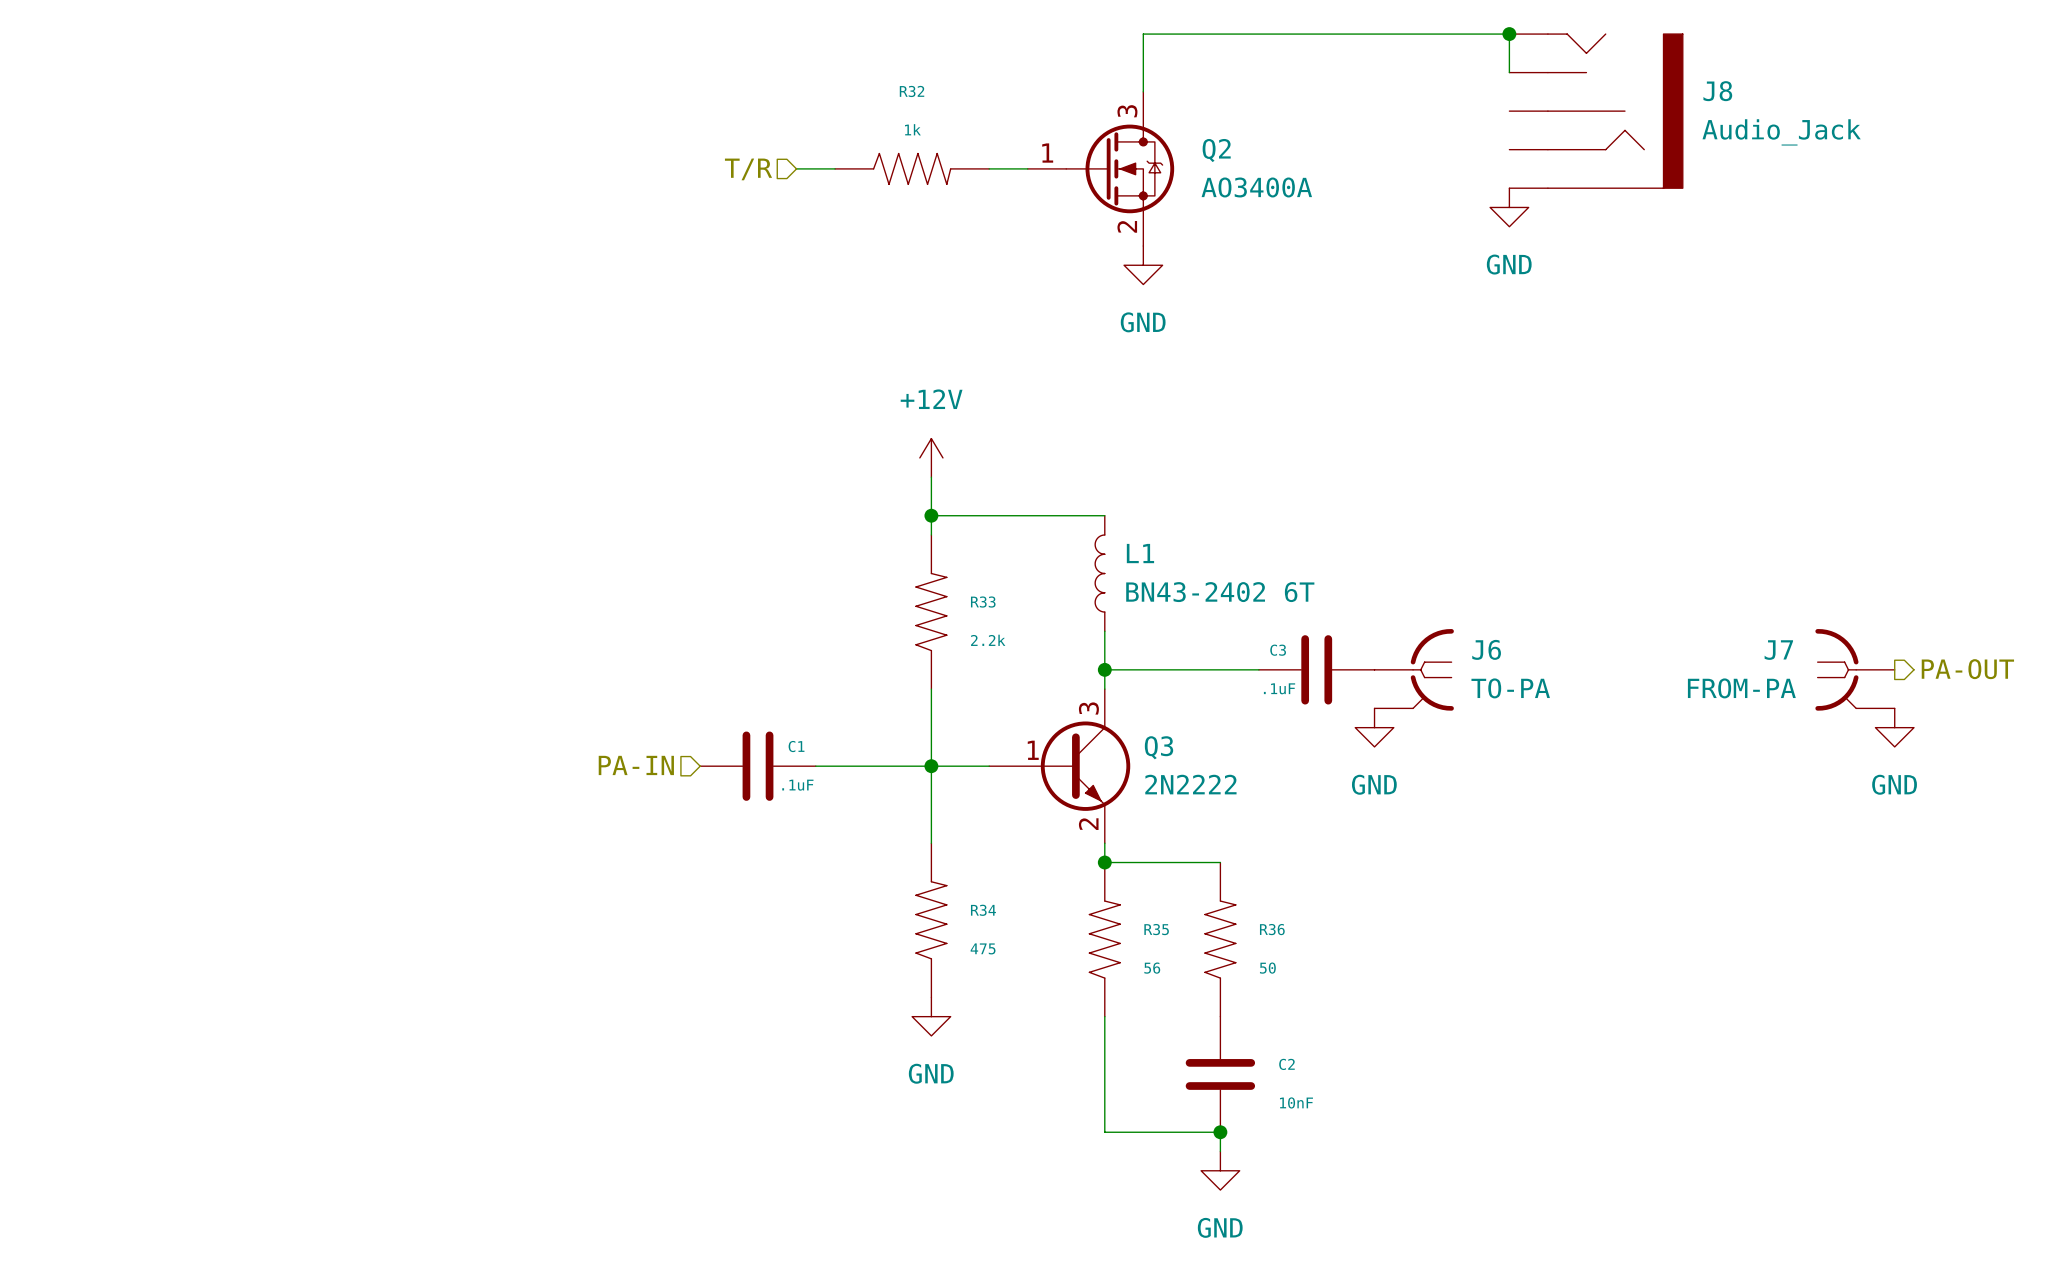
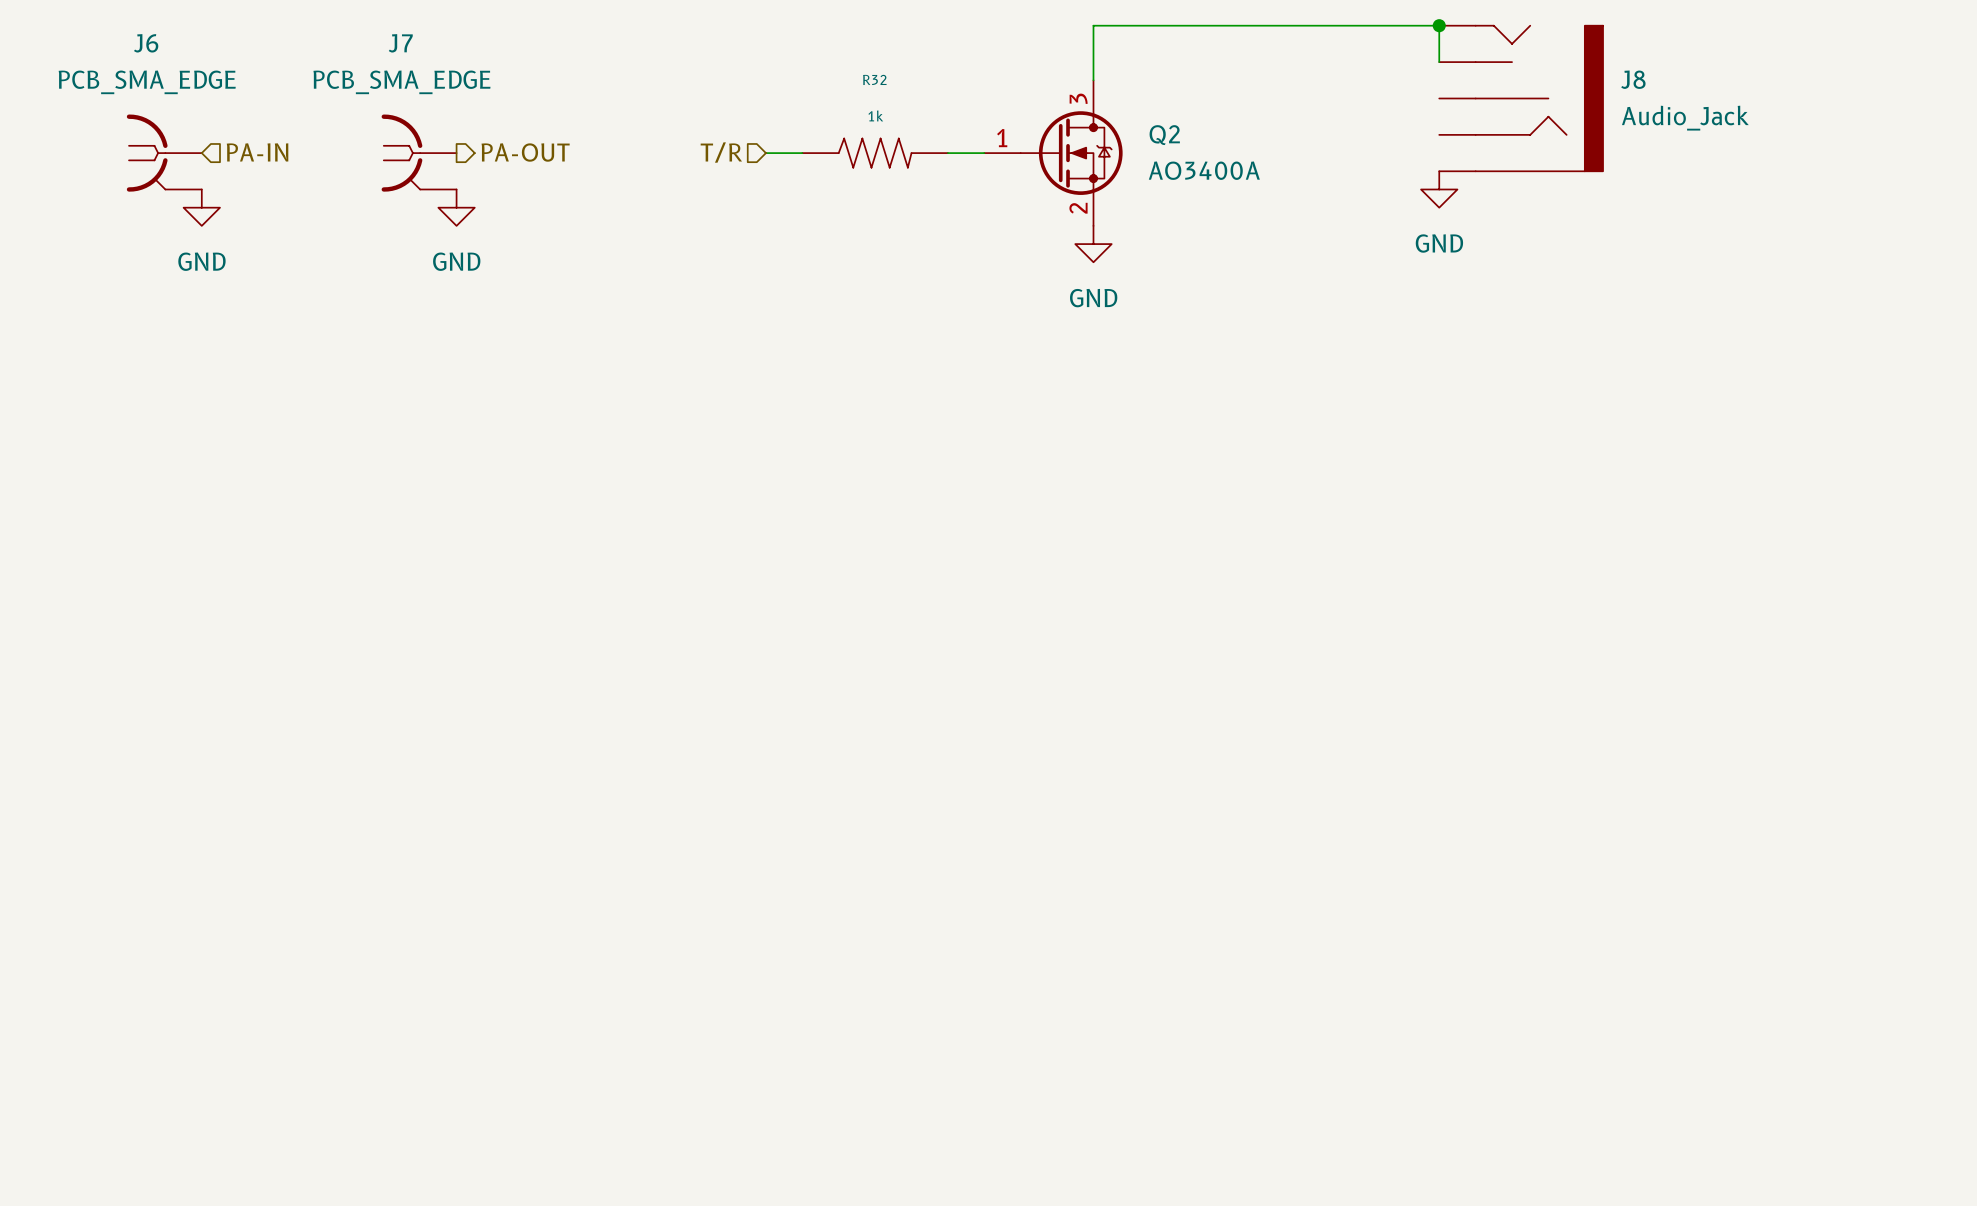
hierarchical label: none -> PA-IN (257, 152)
hierarchical label: none -> PA-OUT (525, 152)
power symbol: none -> GND (201, 207)
power symbol: none -> GND (456, 207)
power symbol: +12V (931, 457) -> none
wire: (931, 477) (931, 534) -> none
wire: (931, 515) (1104, 515) -> none
junction: (931, 515) -> none
L1: BN43-2402 6T (1099, 573) -> none
R33: 2.2k (931, 612) -> none
wire: (1104, 631) (1104, 689) -> none
J6 name position: J6 (1486, 649) -> J6 (146, 43)
J7 name position: J7 (1778, 650) -> J7 (400, 43)
wire: (1104, 669) (1258, 669) -> none
junction: (1104, 669) -> none
C3: .1uF (1316, 669) -> none
J6 position: (1414, 669) -> (164, 153)
J6 flip: as is (1432, 669) -> left-right (147, 153)
J7 position: (1855, 669) -> (419, 153)
hierarchical label: PA-OUT (1967, 669) -> none
J6 value: TO-PA (1510, 688) -> PCB_SMA_EDGE (147, 82)
J7 value: FROM-PA (1741, 688) -> PCB_SMA_EDGE (401, 82)
wire: (931, 689) (931, 843) -> none
power symbol: GND (1374, 727) -> none
power symbol: GND (1894, 727) -> none
hierarchical label: PA-IN (636, 765) -> none
C1: .1uF (758, 766) -> none
wire: (815, 766) (989, 766) -> none
junction: (931, 766) -> none
Q3: 2N2222 (1059, 766) -> none
wire: (1104, 843) (1104, 862) (1220, 862) -> none
junction: (1104, 862) -> none
R34: 475 (931, 920) -> none
R35: 56 (1104, 939) -> none
R36: 50 (1220, 939) -> none
power symbol: GND (931, 1016) -> none
wire: (1104, 1016) (1104, 1132) (1220, 1132) (1220, 1151) -> none
C2: 10nF (1220, 1074) -> none
junction: (1220, 1132) -> none
power symbol: GND (1220, 1170) -> none

